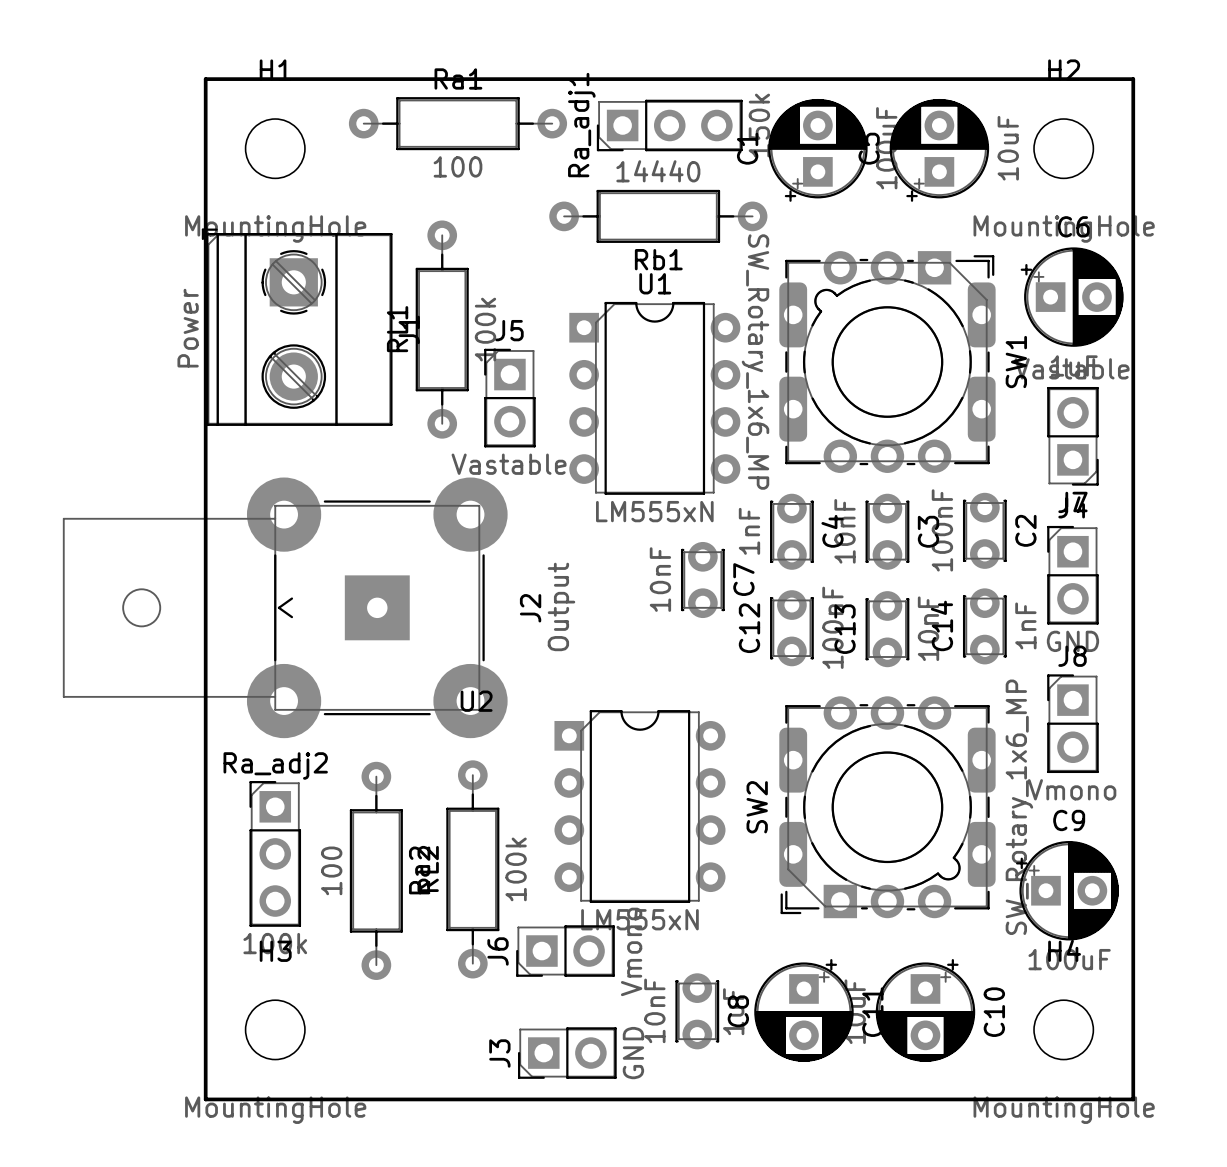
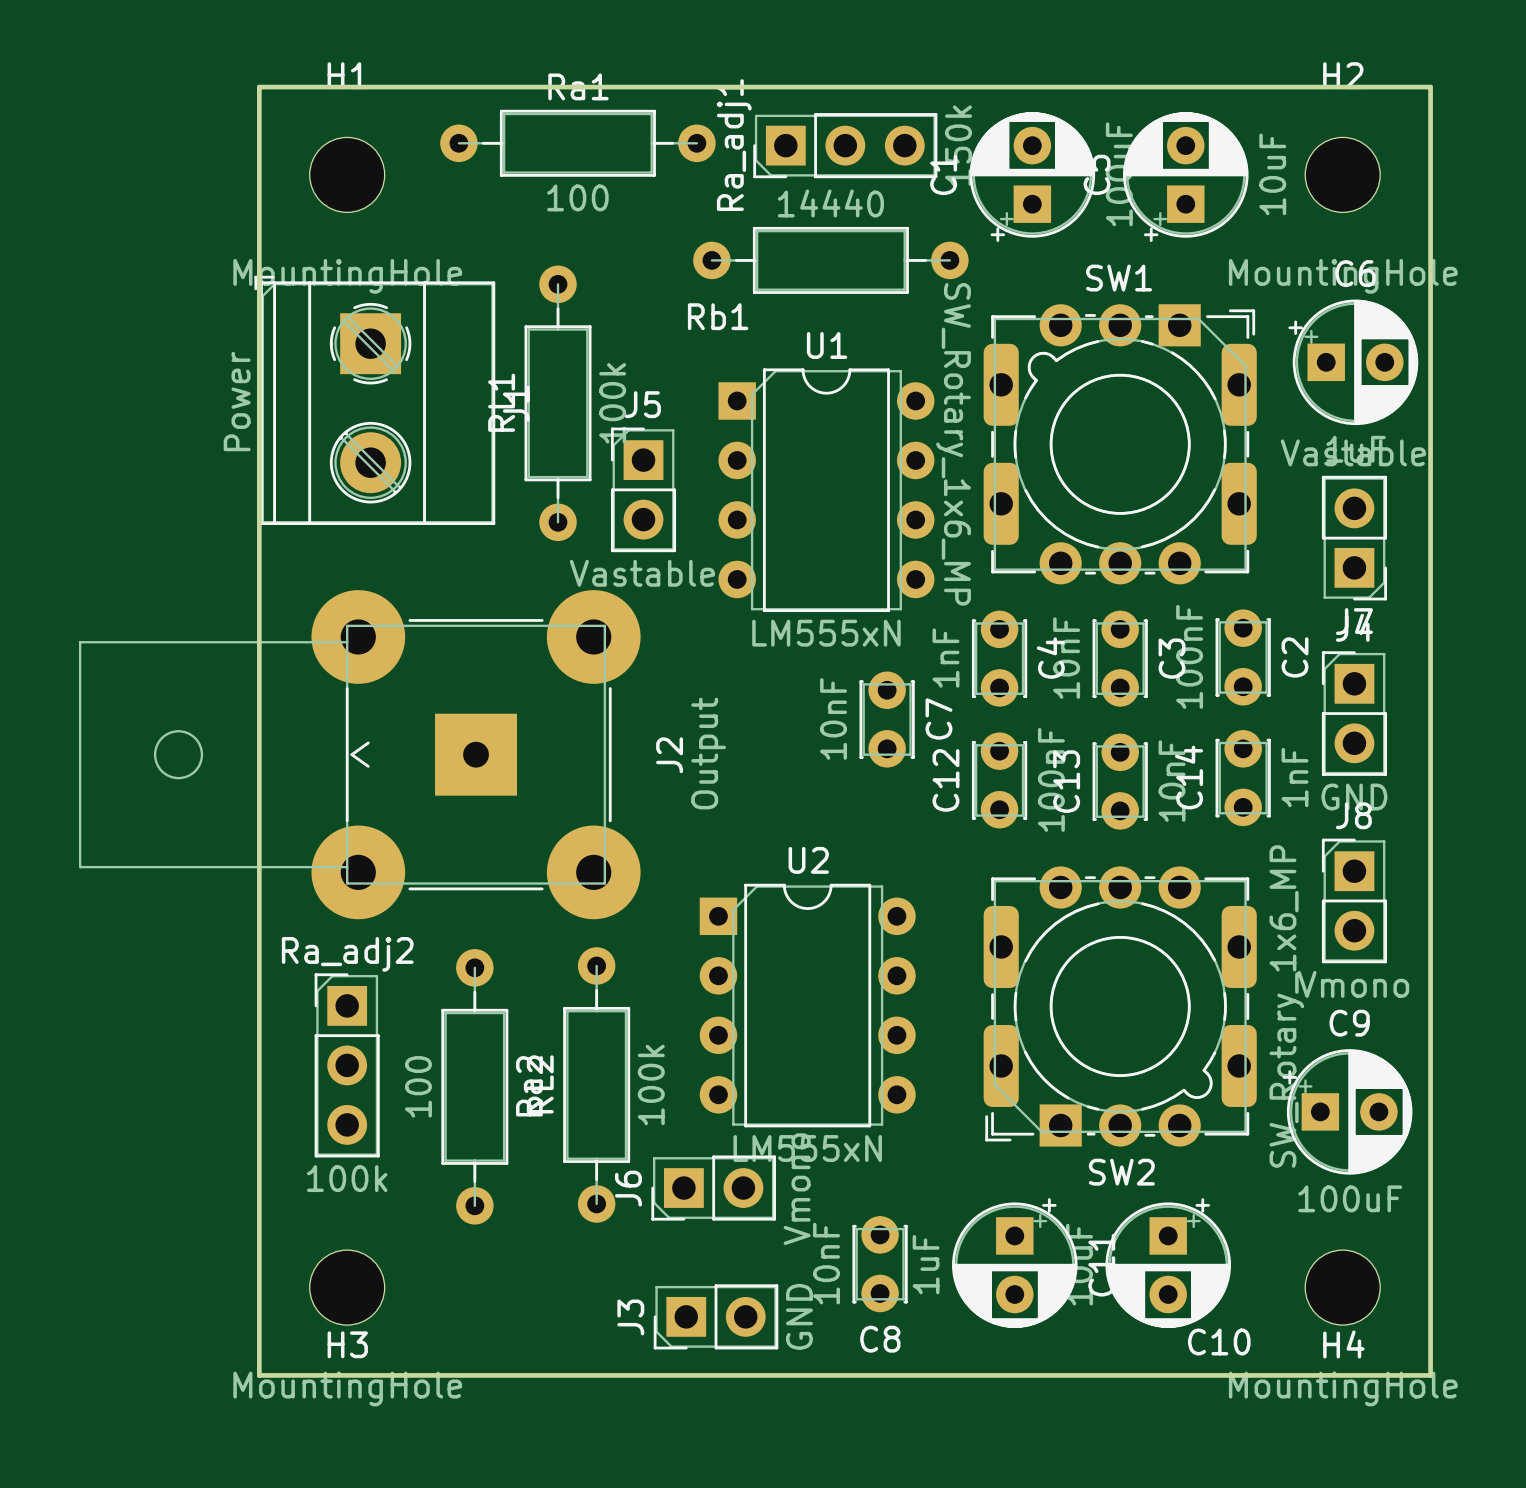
Rb1 name position: Rb1 (658, 259) -> Rb1 (718, 316)
SW1 name rotation: 0° (1016, 362) -> 90° clockwise (1119, 278)
SW1 name position: SW1 (1016, 362) -> SW1 (1119, 278)
U2 name position: U2 (476, 701) -> U2 (808, 860)
SW2 name rotation: 0° (757, 807) -> 90° clockwise (1121, 1172)
SW2 name position: SW2 (757, 807) -> SW2 (1121, 1172)
H4 name position: H4 (1064, 950) -> H4 (1343, 1344)
H3 name position: H3 (275, 951) -> H3 (347, 1344)
C8 name rotation: 0° (738, 1011) -> 90° clockwise (880, 1339)
C8 name position: C8 (738, 1011) -> C8 (880, 1339)
C10 name rotation: 0° (994, 1012) -> 90° clockwise (1219, 1342)
C10 name position: C10 (994, 1012) -> C10 (1219, 1342)

